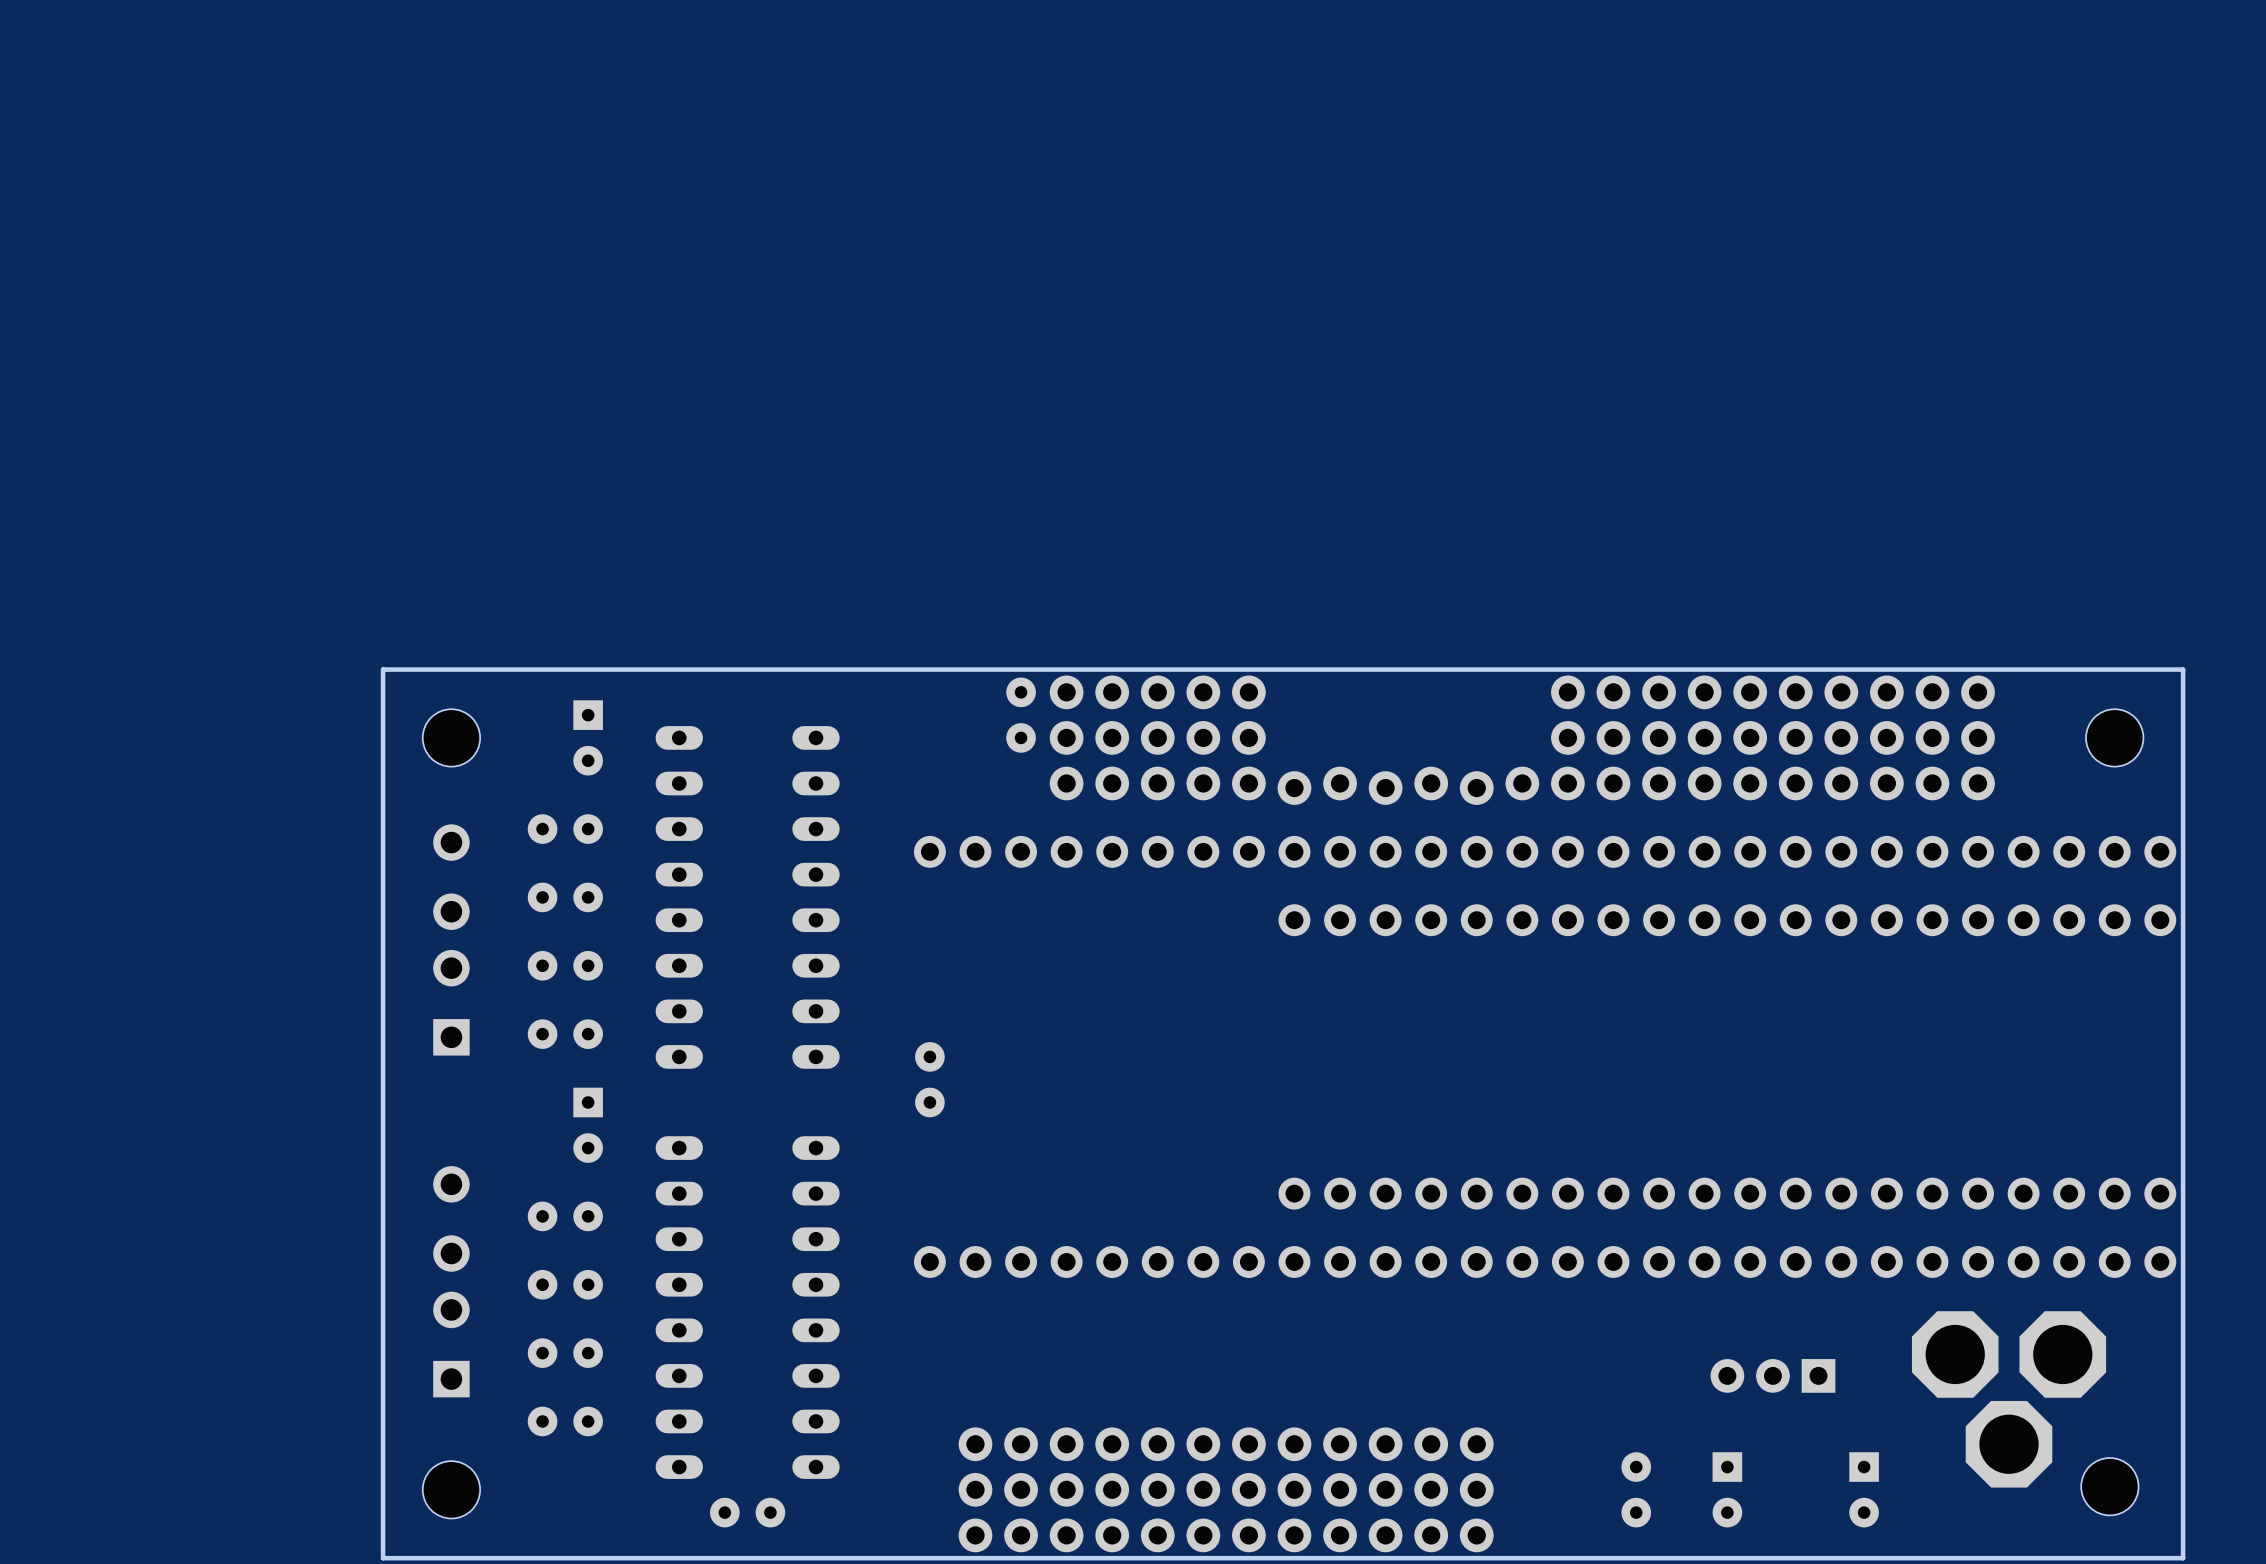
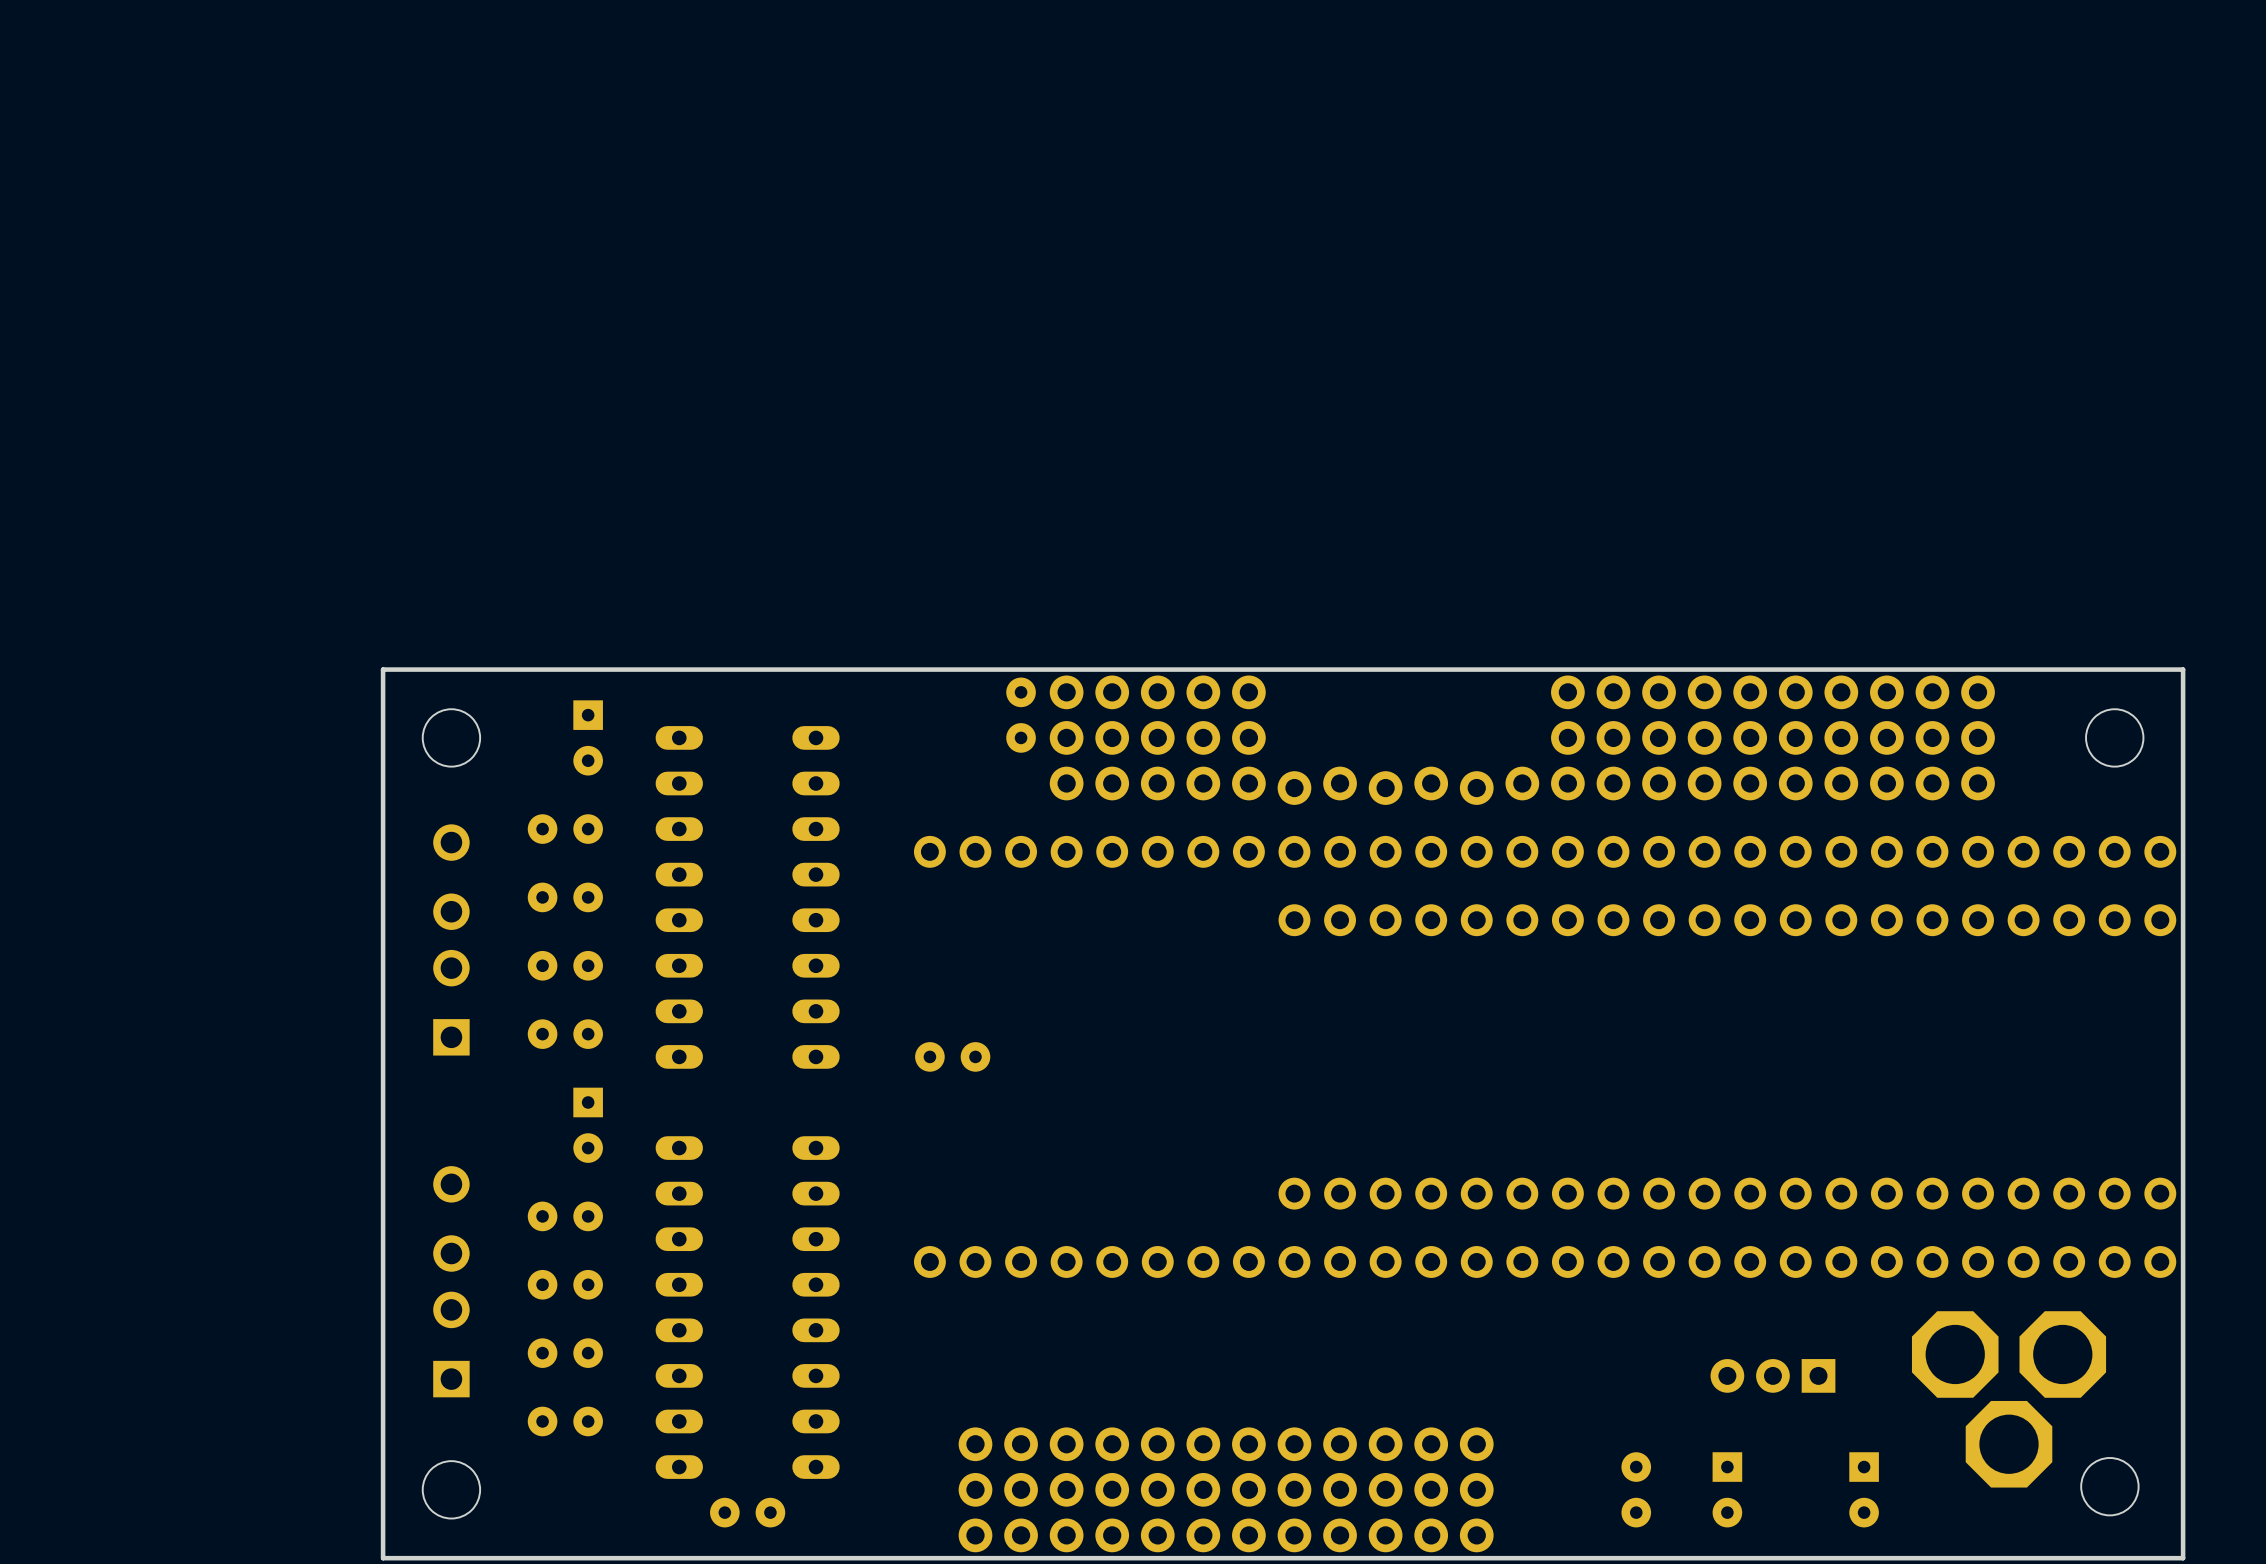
part rotation: 0° (929, 1079) -> 90° clockwise (952, 1056)

